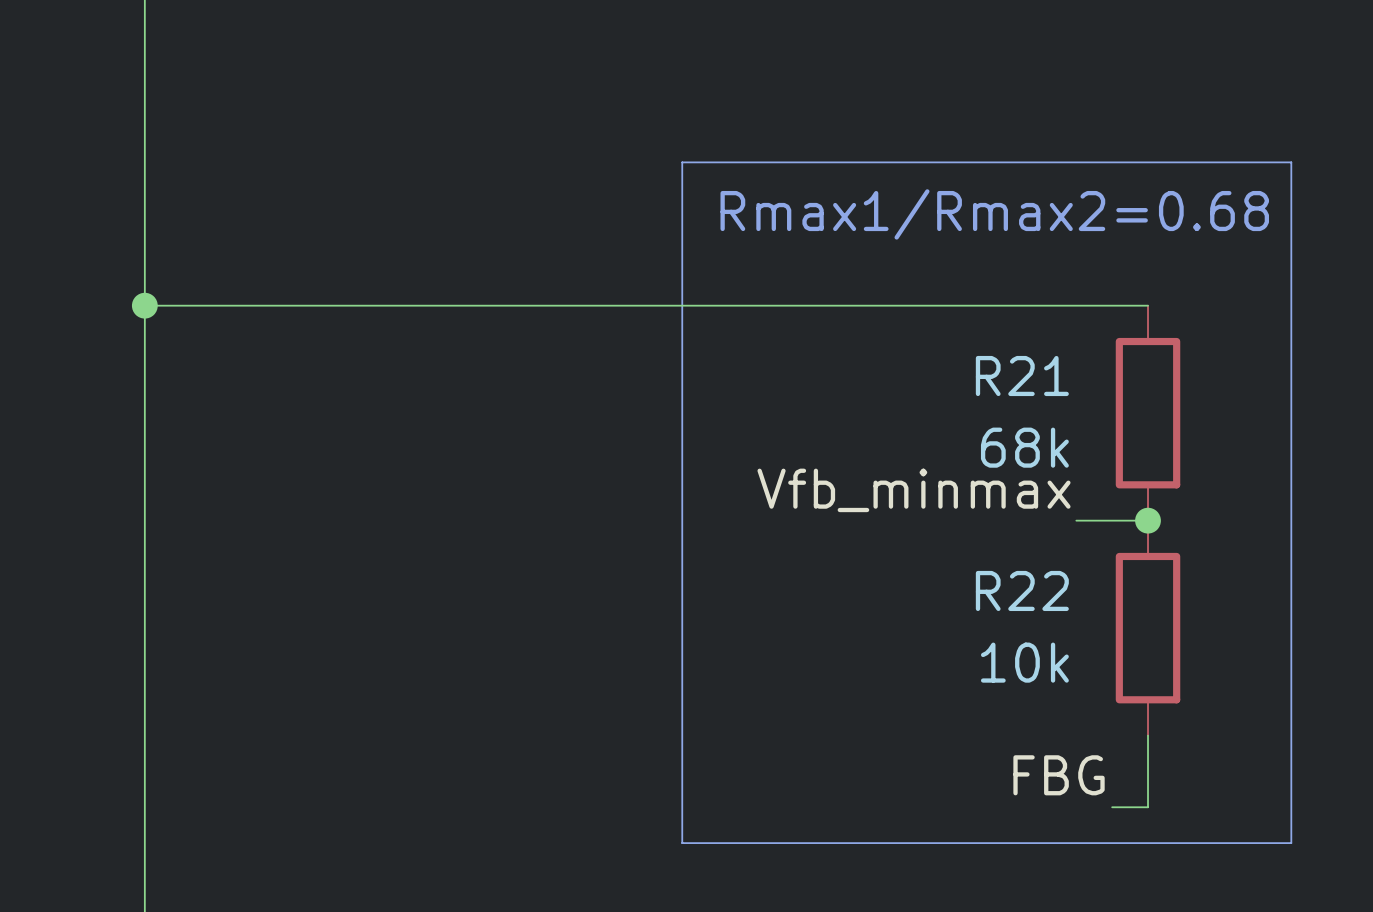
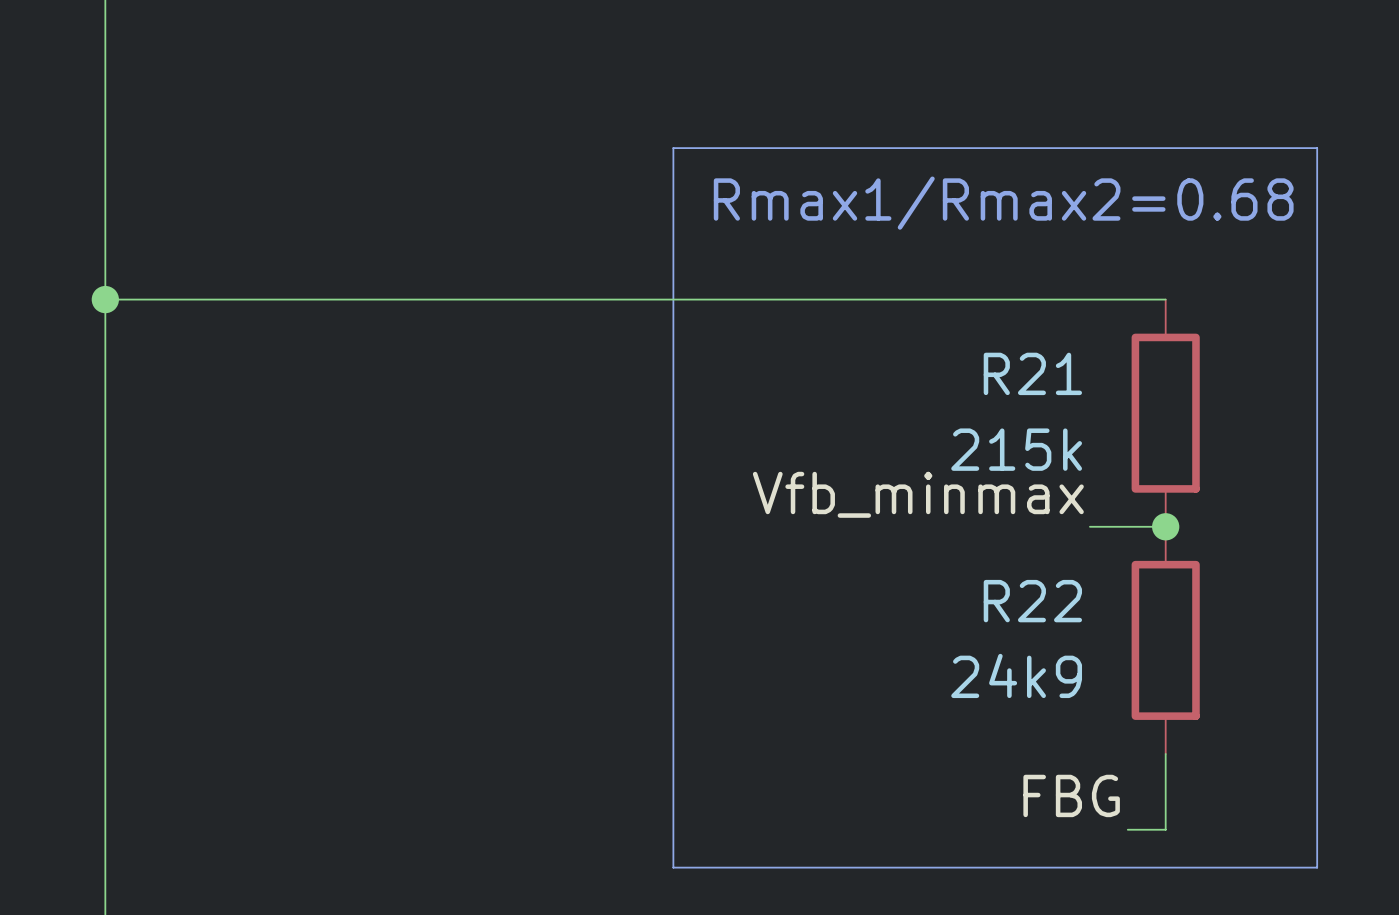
R21 value: 68k (1024, 447) -> 215k (1016, 449)
R22 value: 10k (1024, 662) -> 24k9 (1016, 675)

